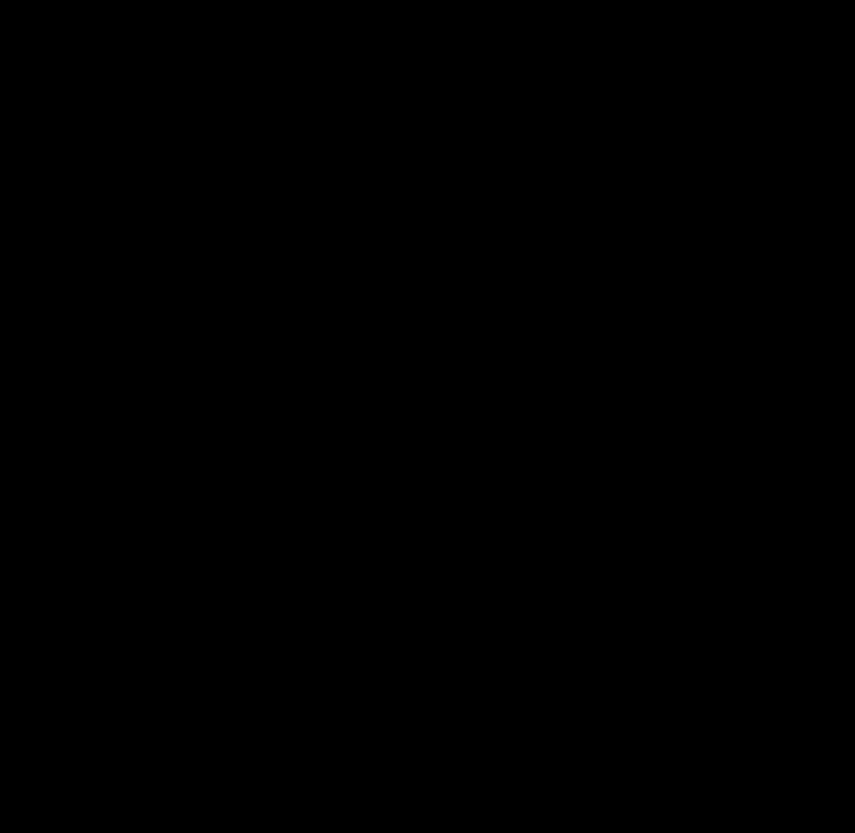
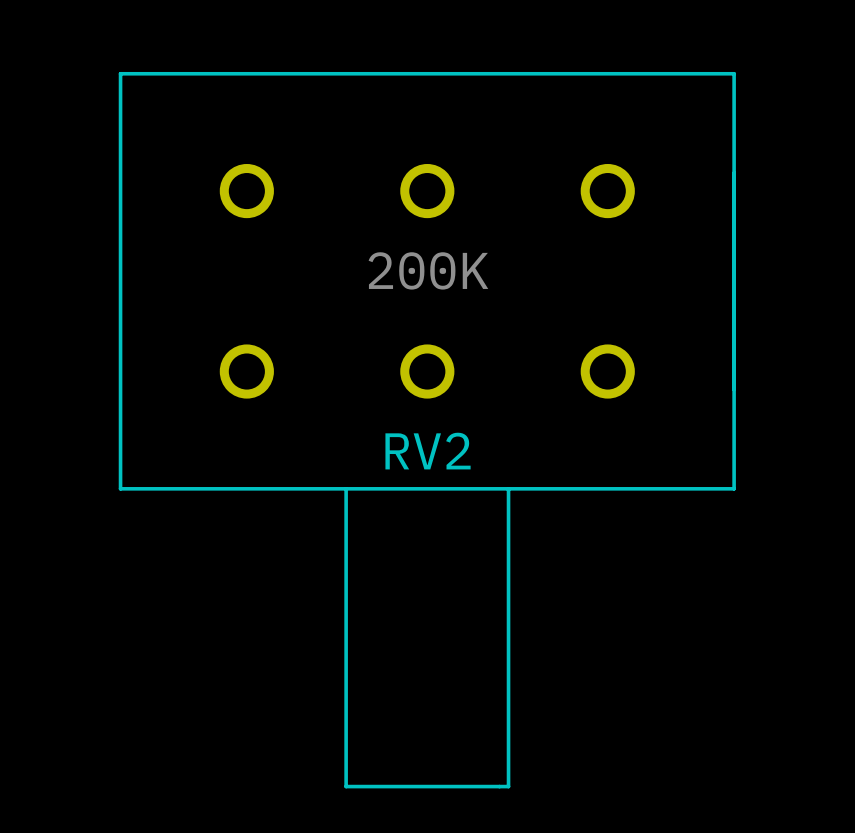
RV2: none -> 200K (427, 430)

